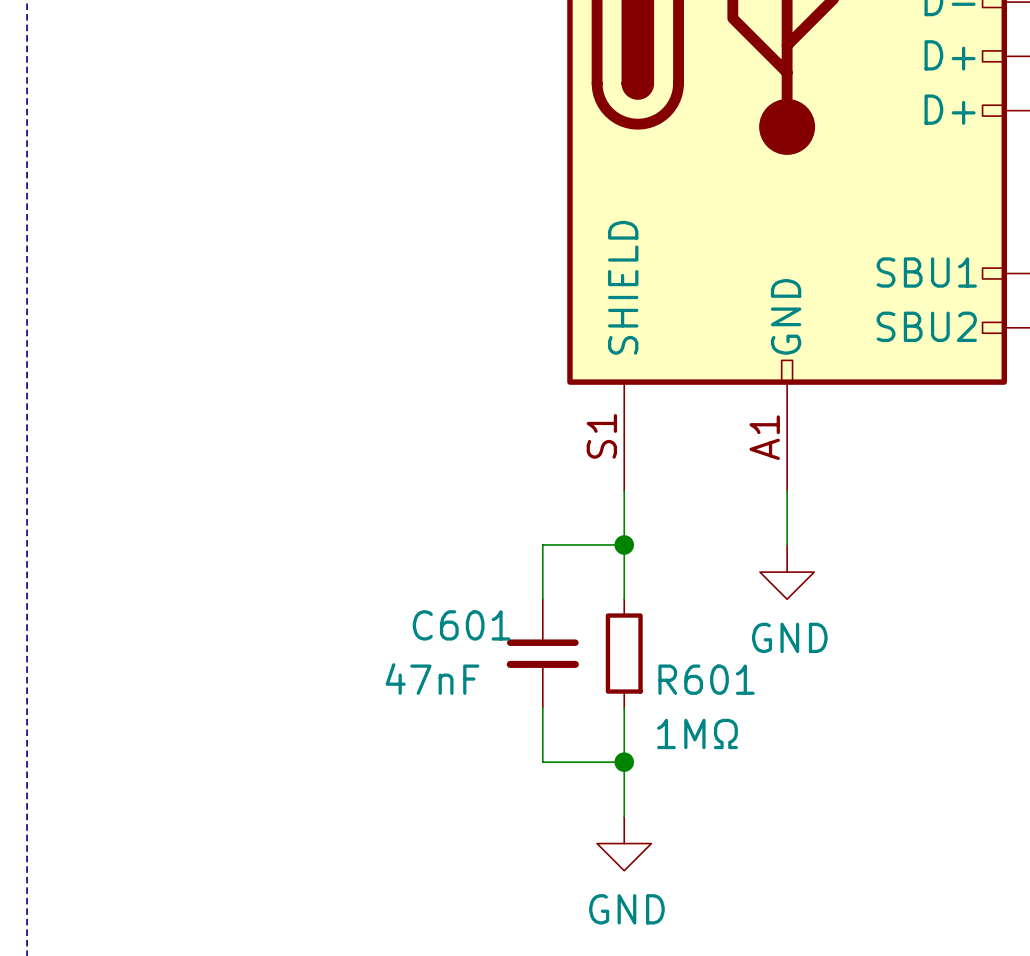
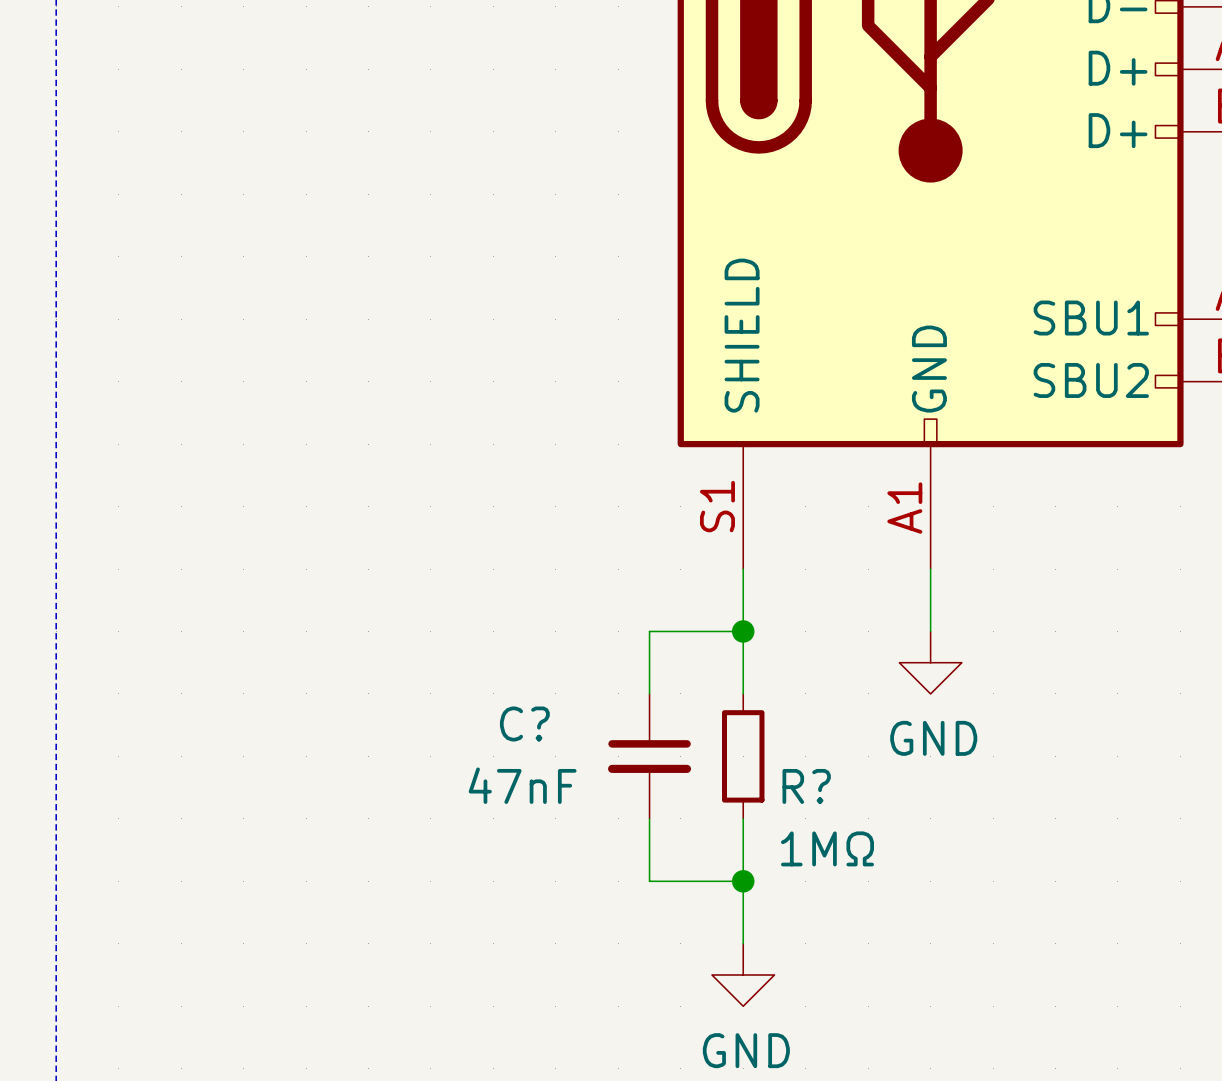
C601 name: C601 (461, 625) -> C? (524, 723)
R601 name: R601 (706, 679) -> R? (806, 786)

